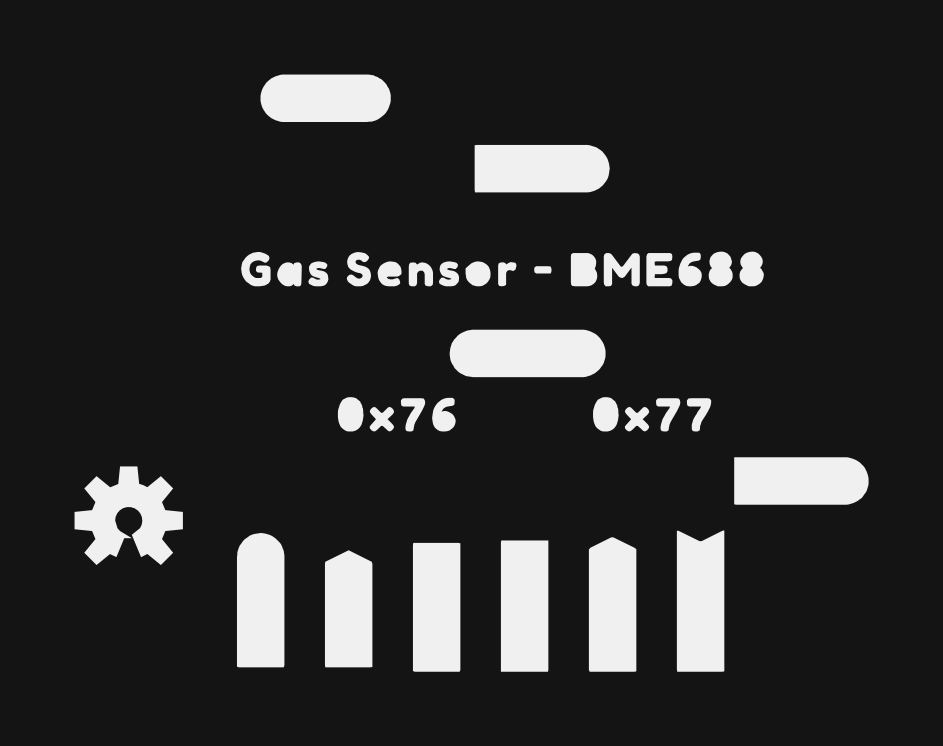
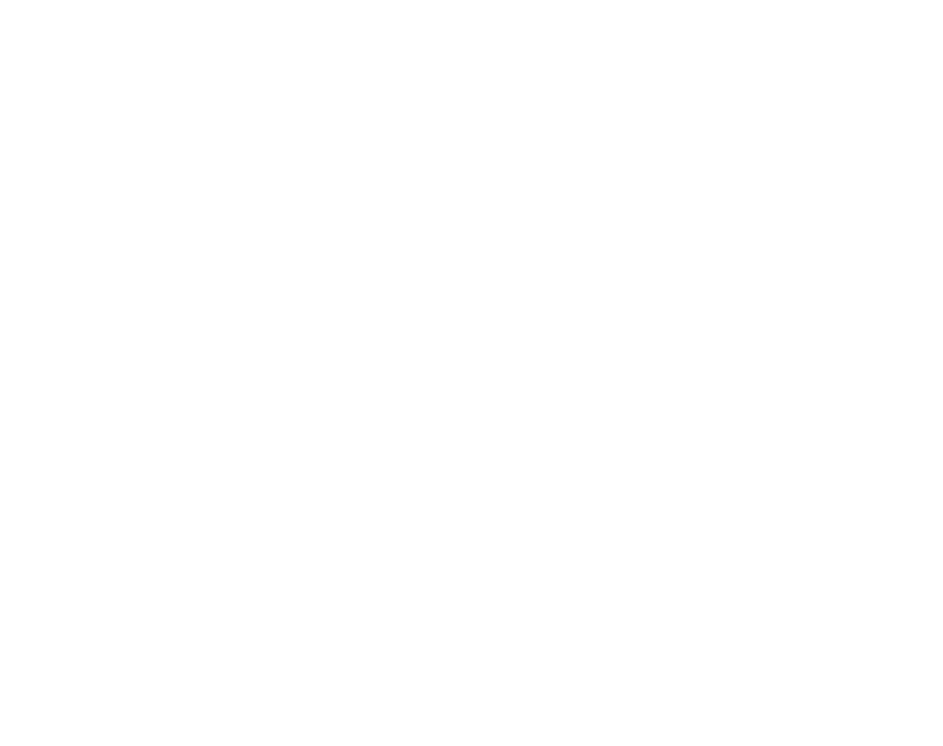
drawing: [260, 74, 391, 123] -> none
drawing: [474, 144, 610, 193] -> none
drawing: [241, 251, 764, 287] -> none
drawing: [236, 329, 869, 672] -> none
drawing: [74, 466, 183, 566] -> none

